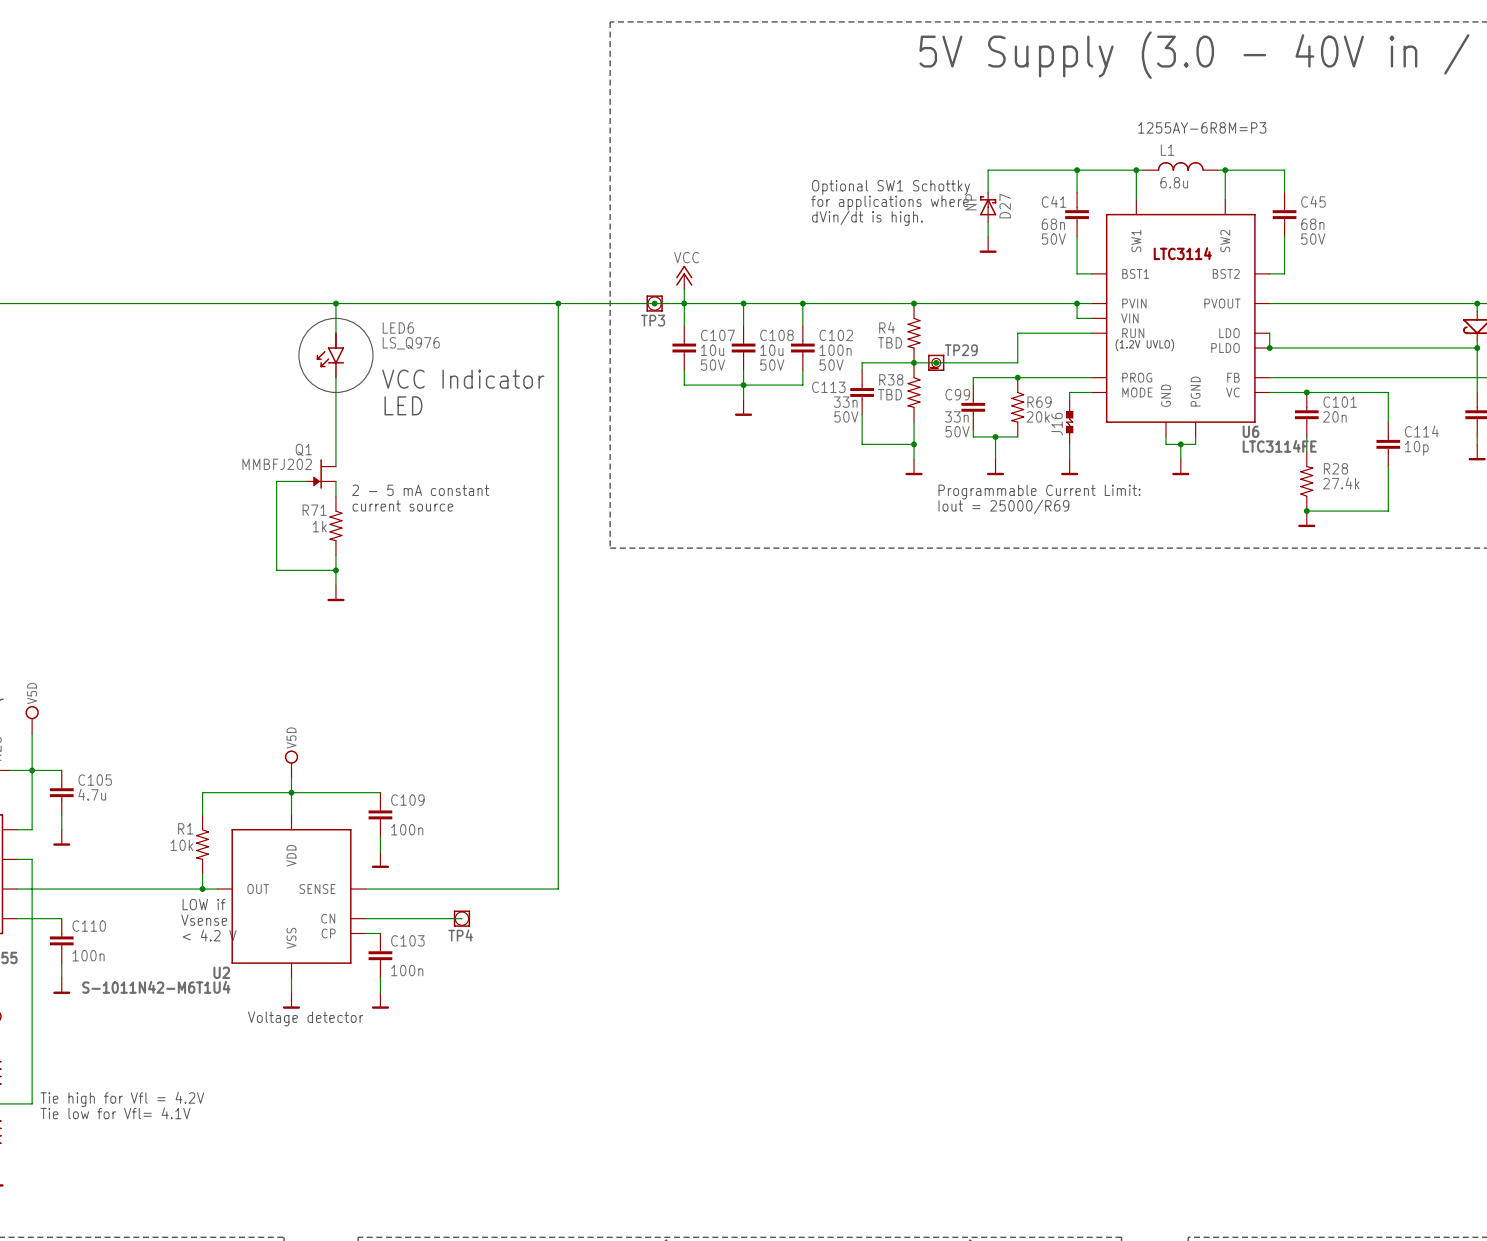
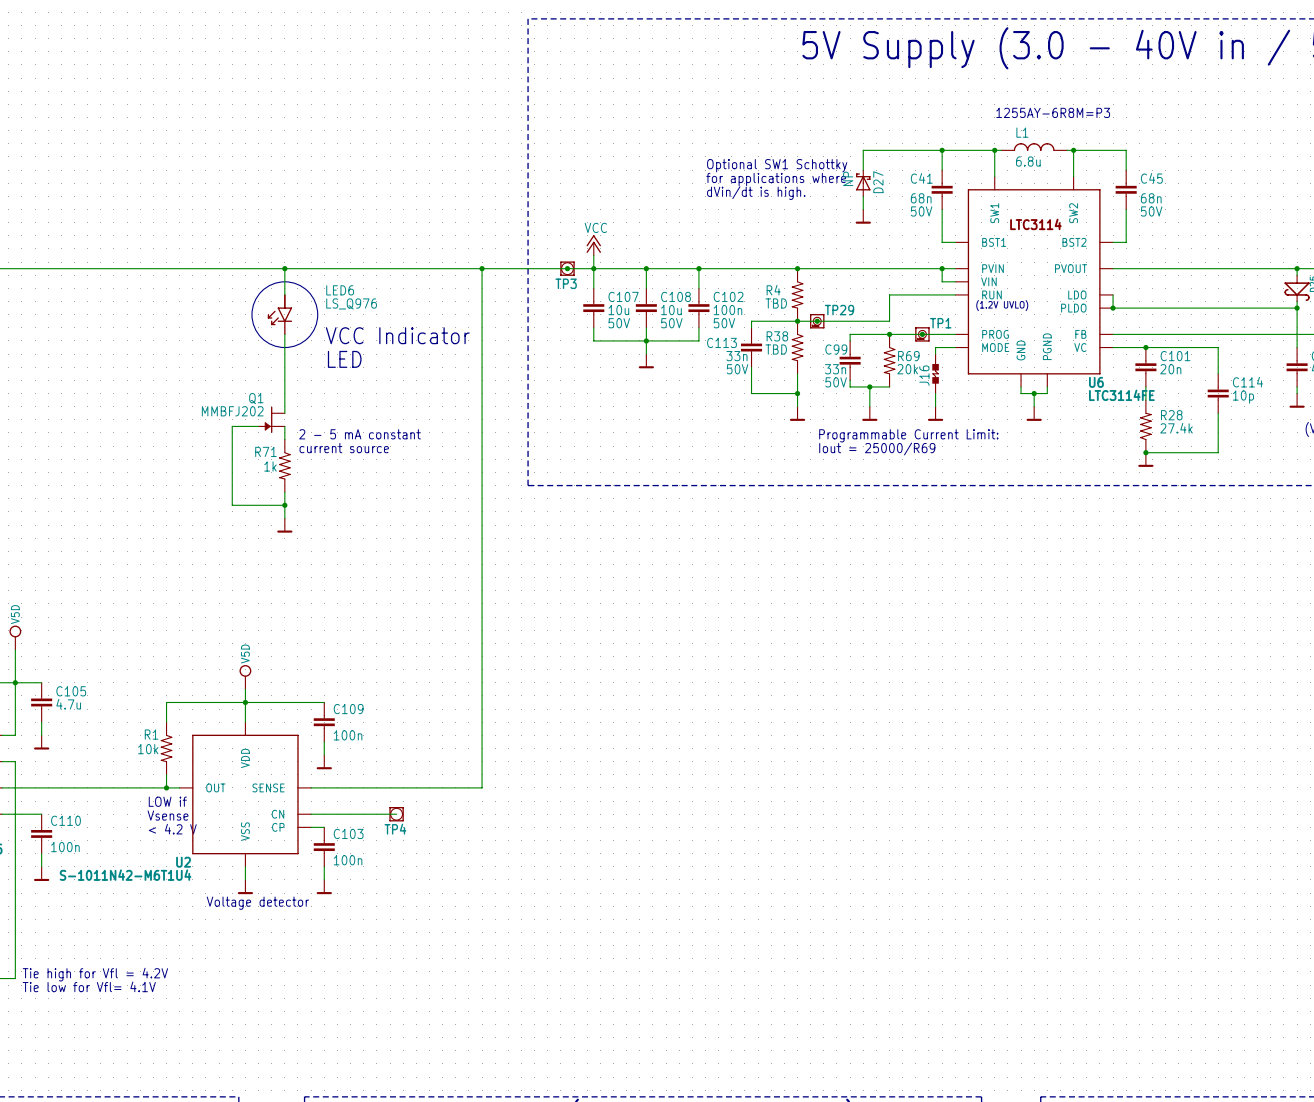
TP1: none -> (922, 334)
junction: none -> (922, 334)

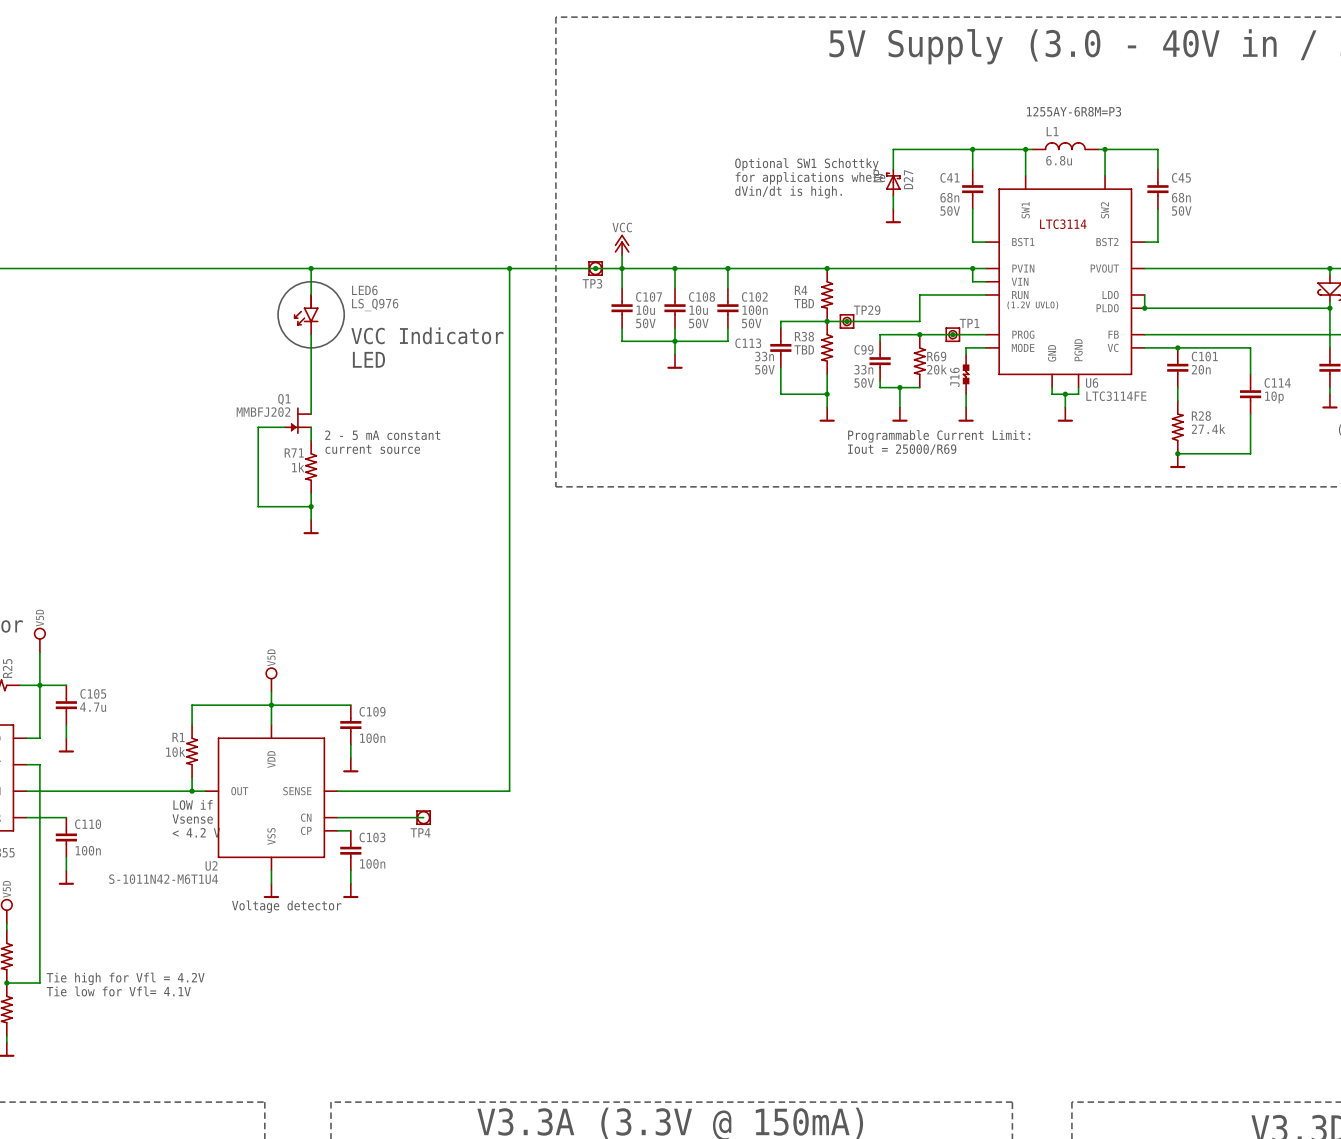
U6 name position: U6 (1096, 382) -> U6 (1092, 382)
U6 value position: LTC3114FE (1121, 395) -> LTC3114FE (1116, 396)

